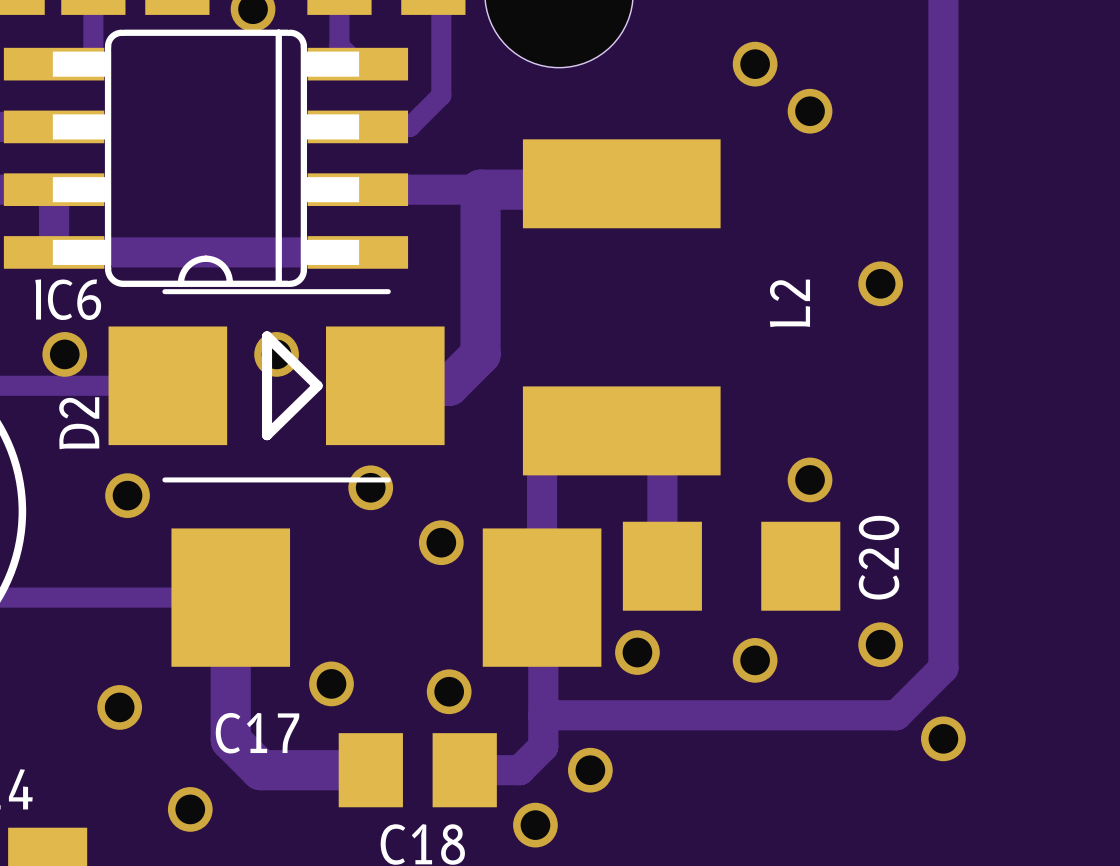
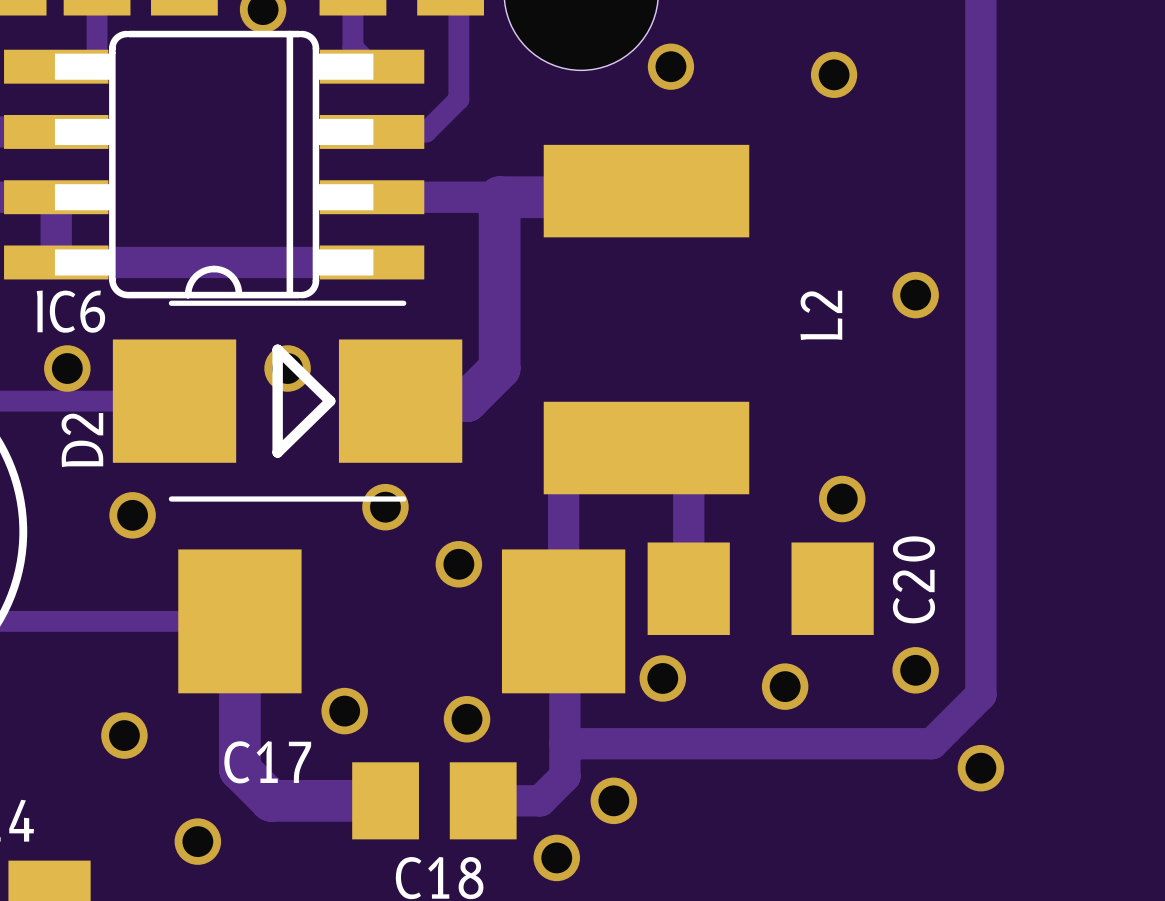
via: none -> (670, 66)
via: (755, 64) -> none
via position: (810, 111) -> (834, 74)

